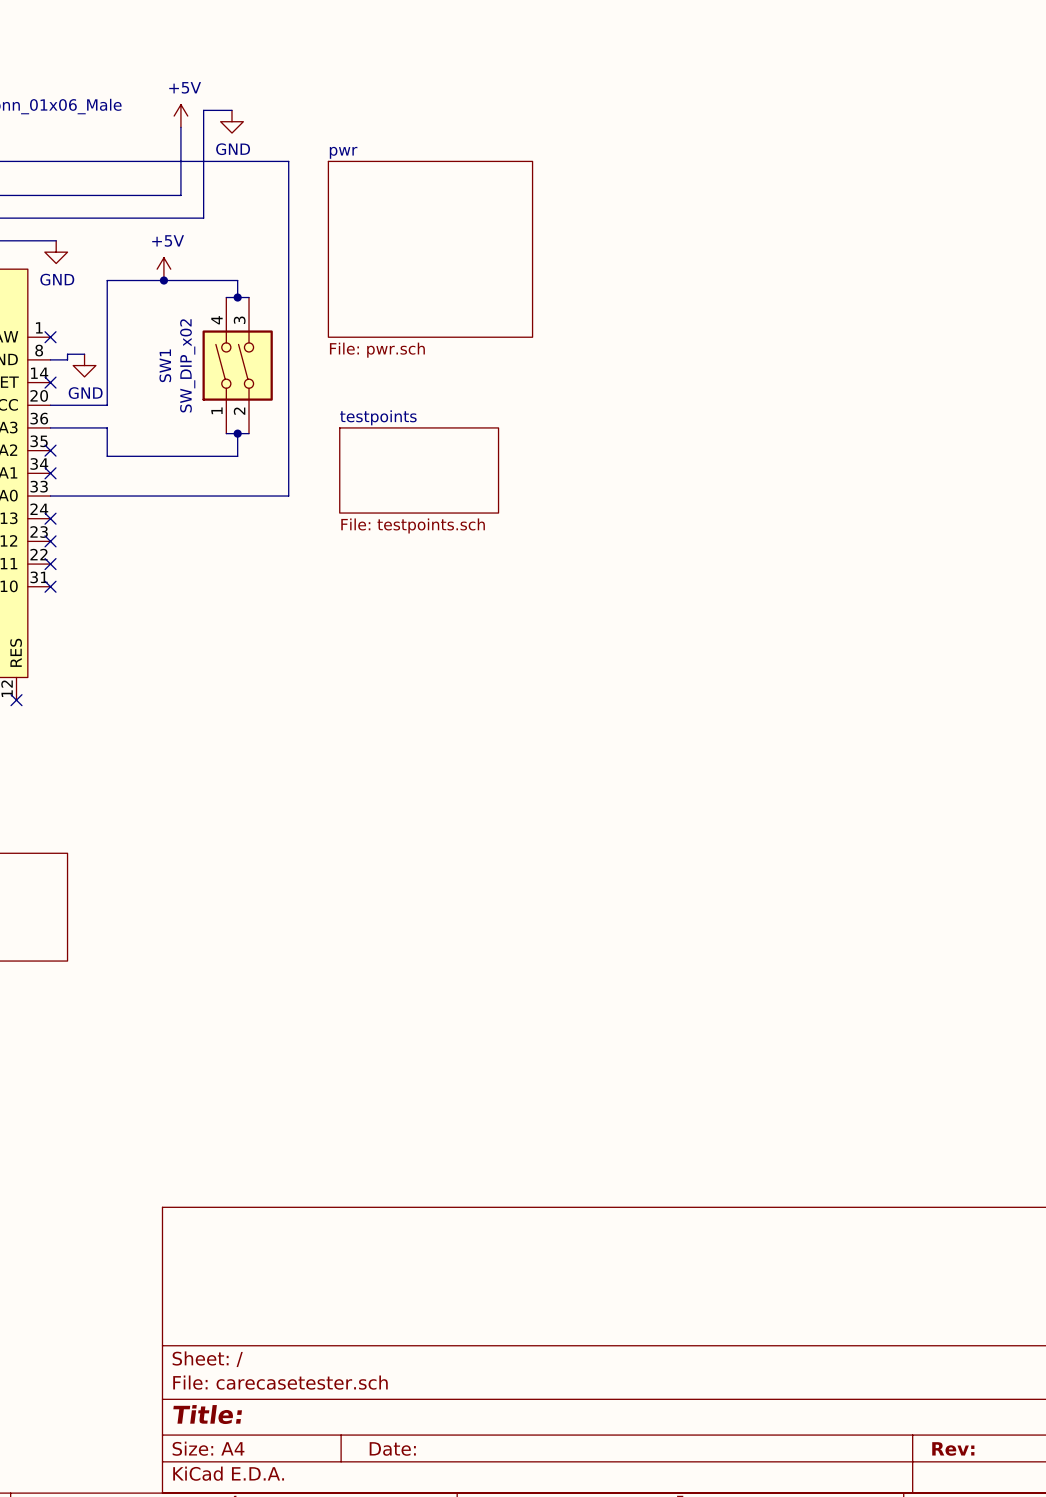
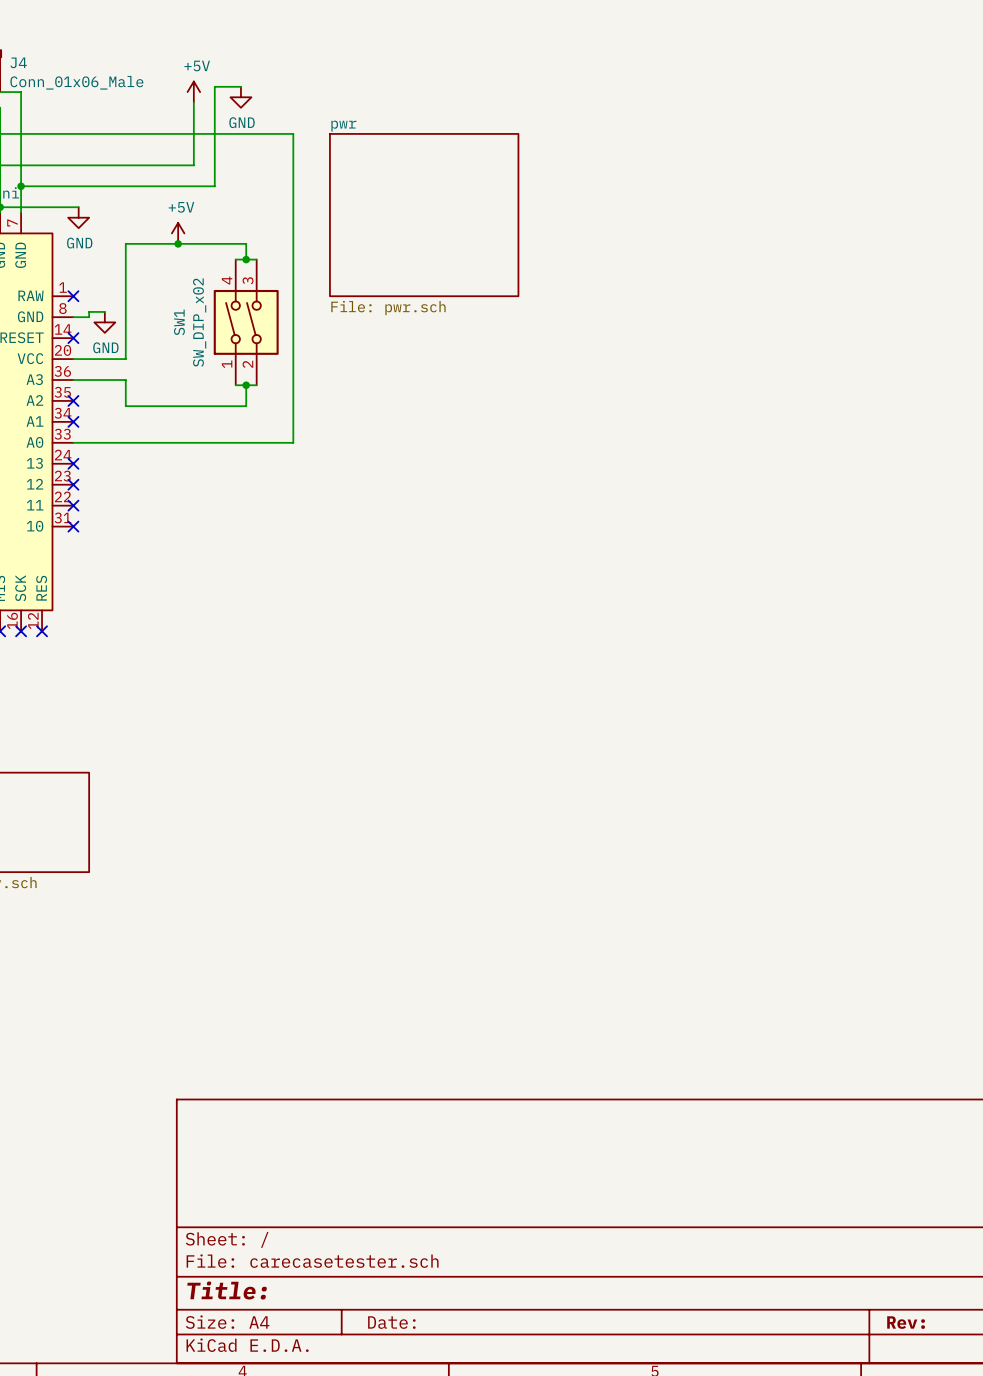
sheet testpoints: File: testpoints.sch (419, 470) -> none

